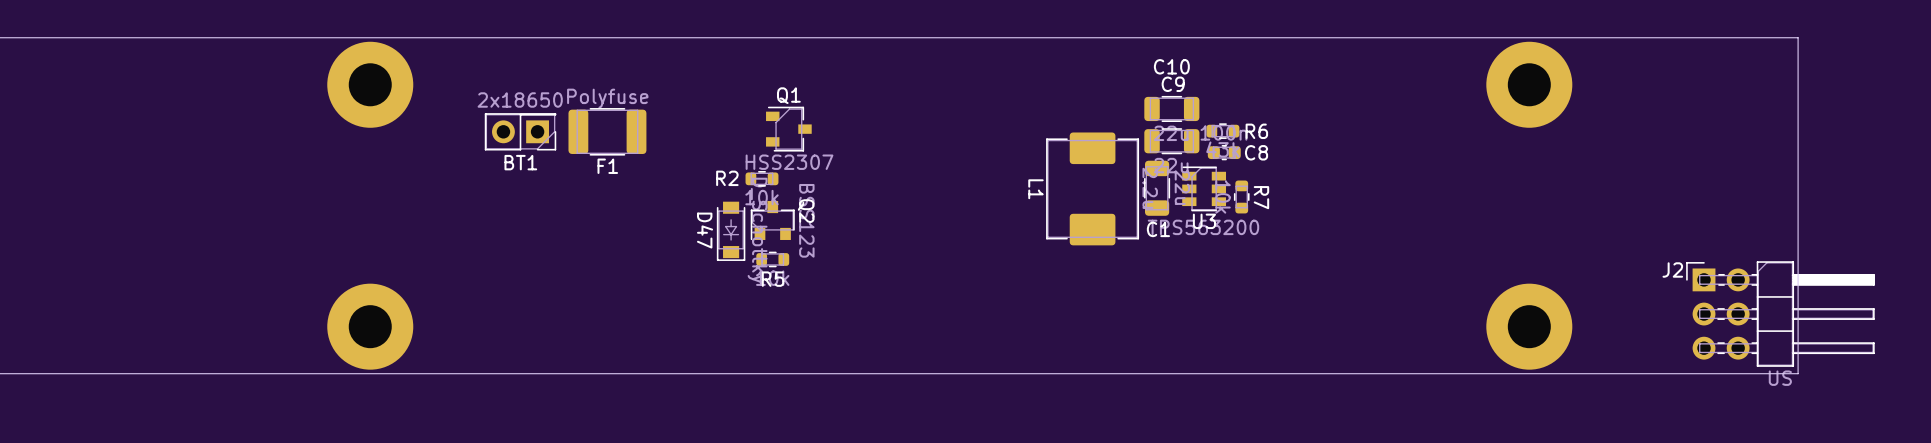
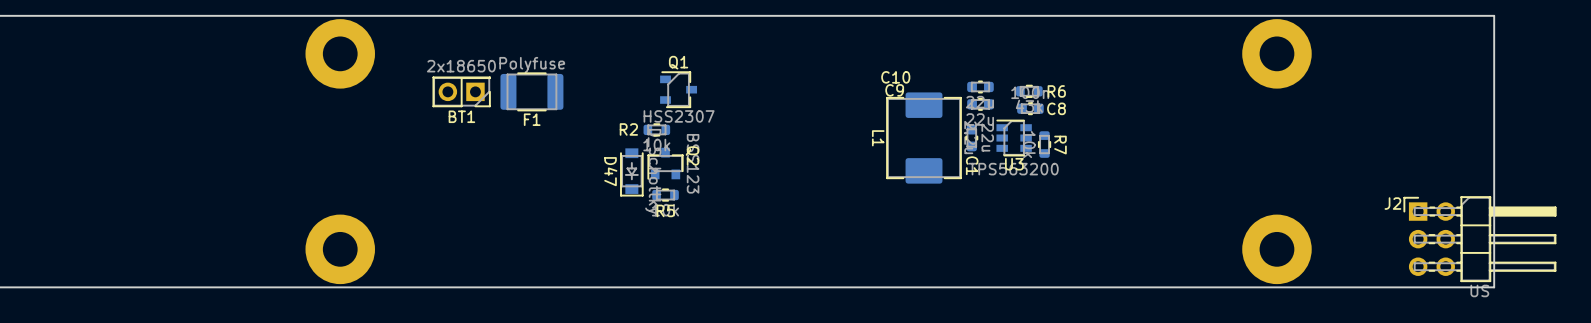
C10 name position: C10 (1171, 66) -> C10 (895, 77)
C9 name position: C9 (1173, 84) -> C9 (894, 90)
C10 footprint: [1144, 95, 1200, 123] -> [967, 80, 994, 94]
C9 footprint: [1144, 128, 1200, 155] -> [967, 98, 994, 111]
C1 footprint: [1144, 160, 1171, 216] -> [965, 124, 978, 152]

